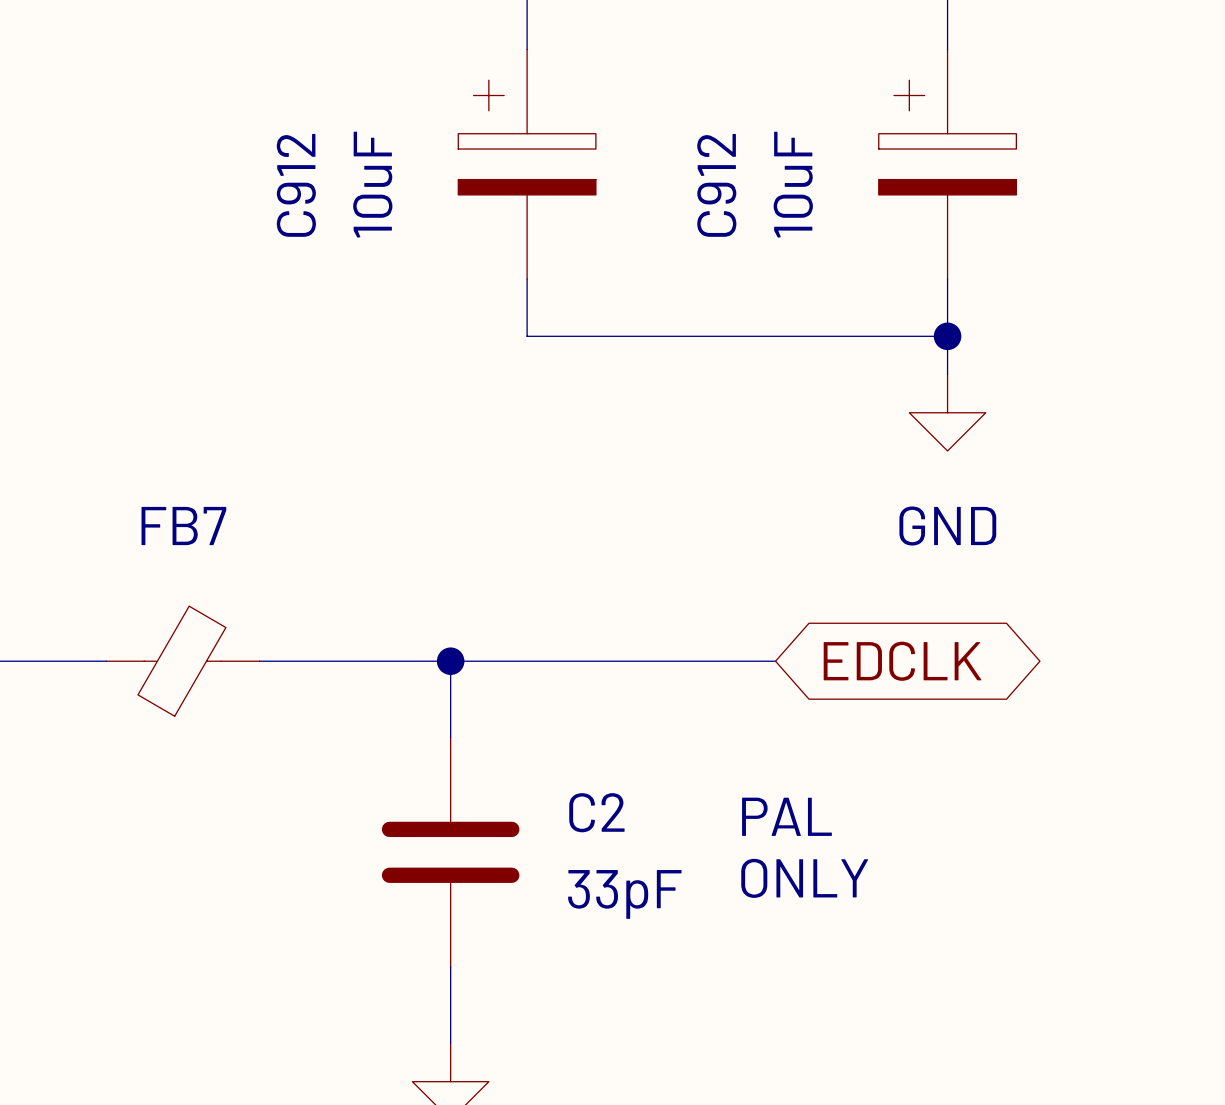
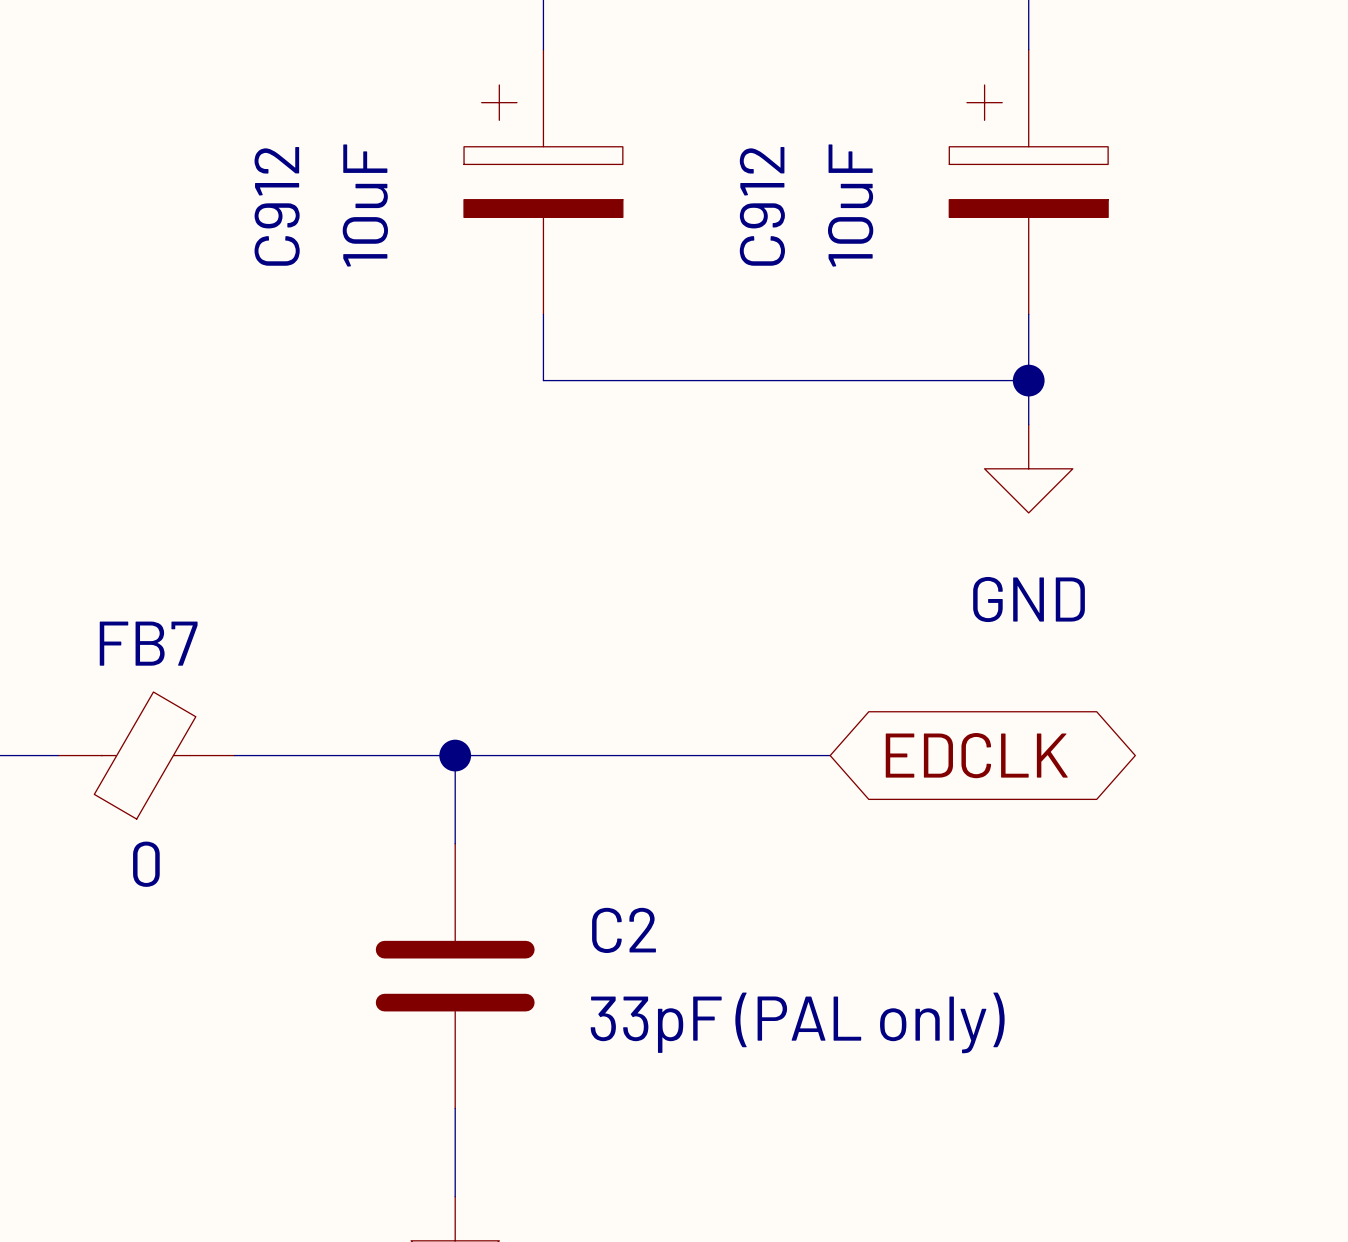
FB7 name position: FB7 (183, 526) -> FB7 (148, 643)
FB7 value: none -> 0 (146, 864)
text: PAL (786, 816) -> none
text: ONLY (804, 878) -> none
C2 value: 33pF (624, 894) -> 33pF (PAL only) (797, 1022)

